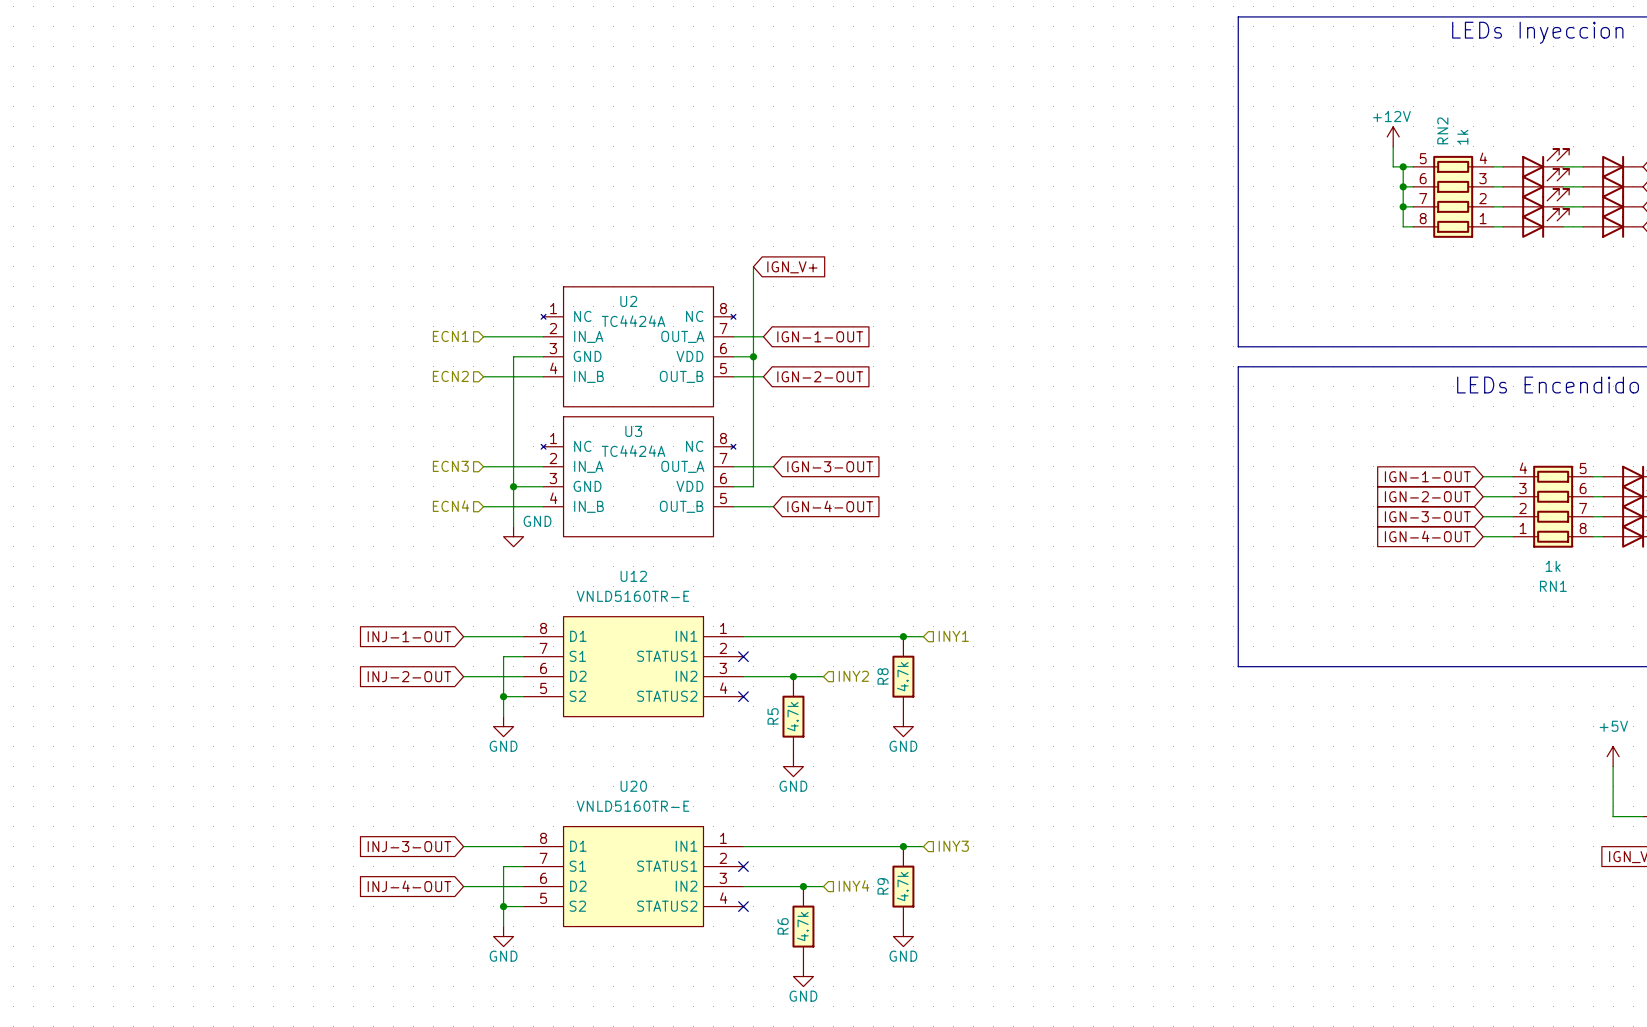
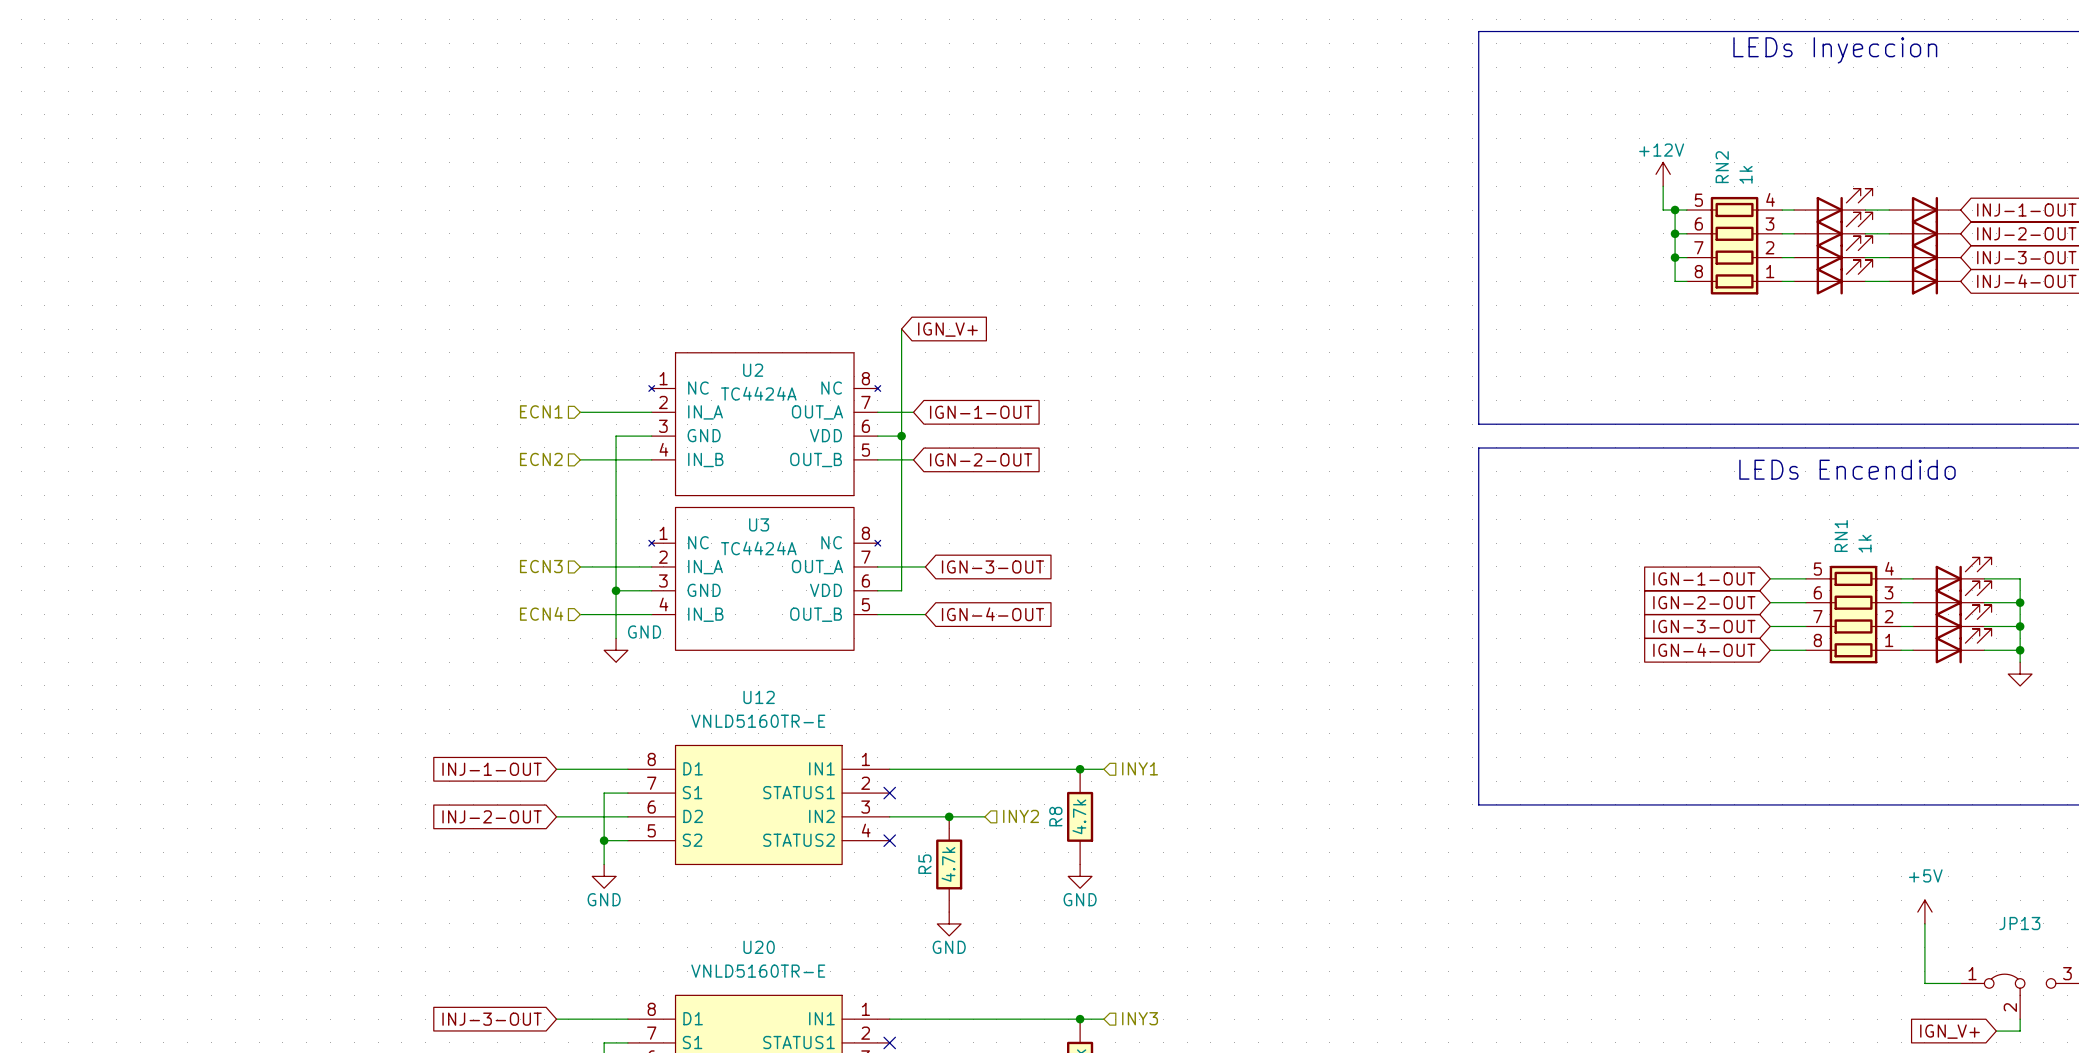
RN1 flip: as is (1553, 506) -> left-right (1853, 614)
RN1 value position: 1k (1553, 566) -> 1k (1865, 543)
RN1 name position: RN1 (1553, 586) -> RN1 (1841, 536)

